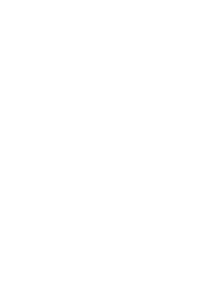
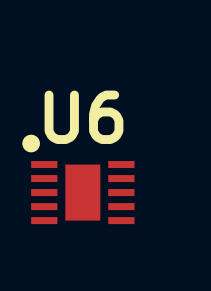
U6: none -> (78, 179)

